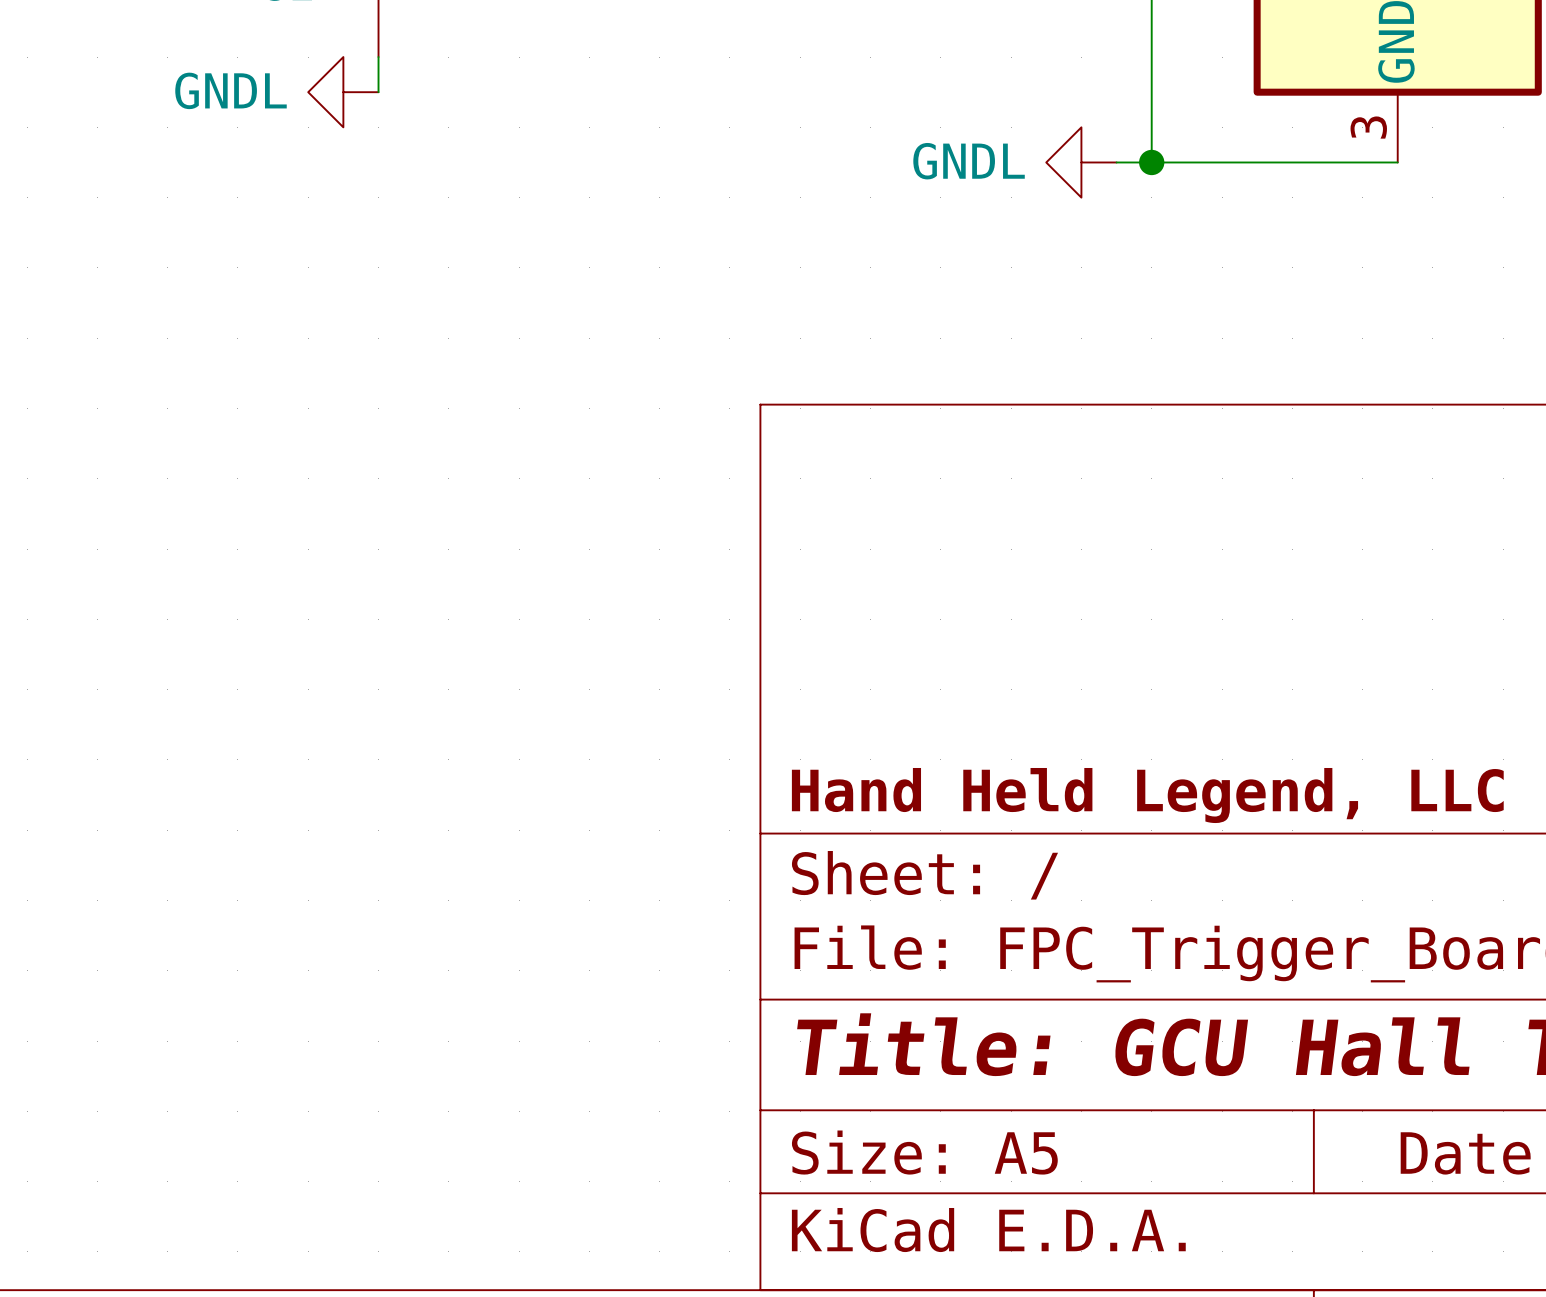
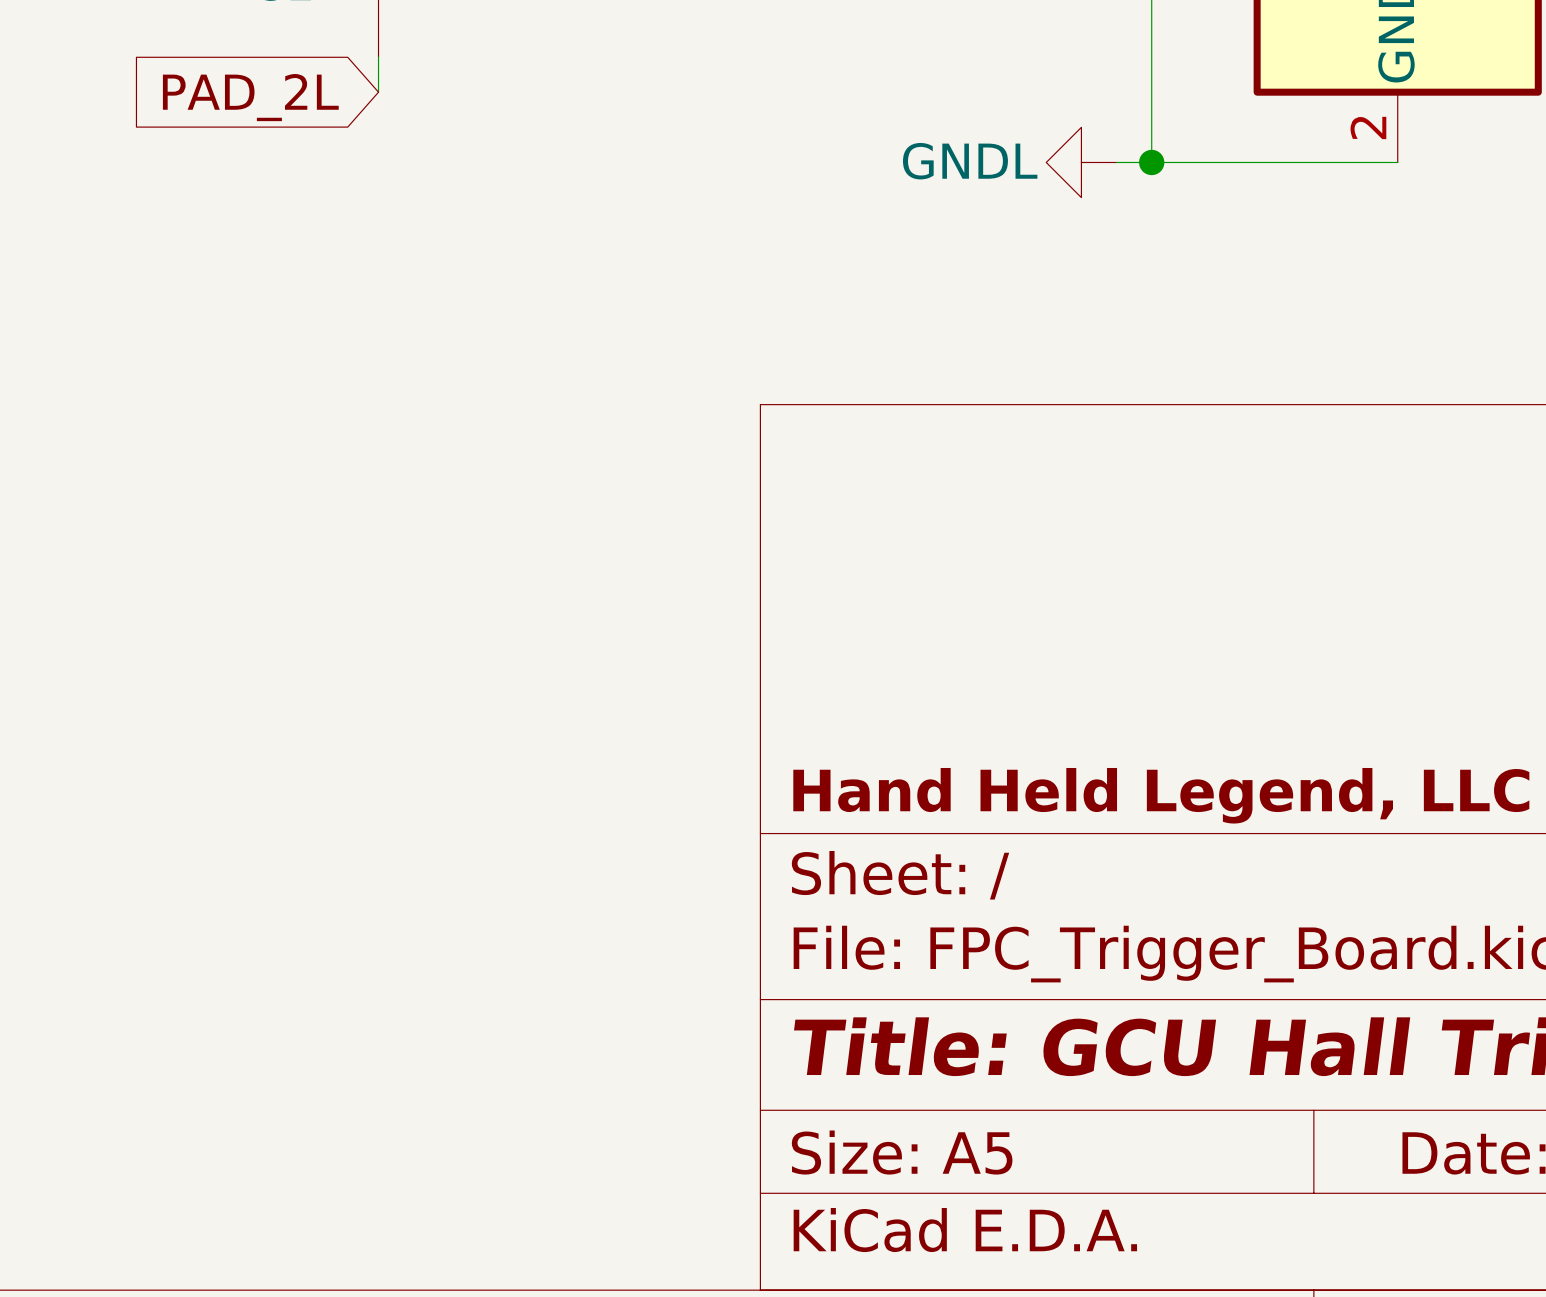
power symbol: GNDL (343, 92) -> none
global label: none -> PAD_2L (250, 97)
part pin number: 3 (1368, 127) -> 2 (1368, 127)

